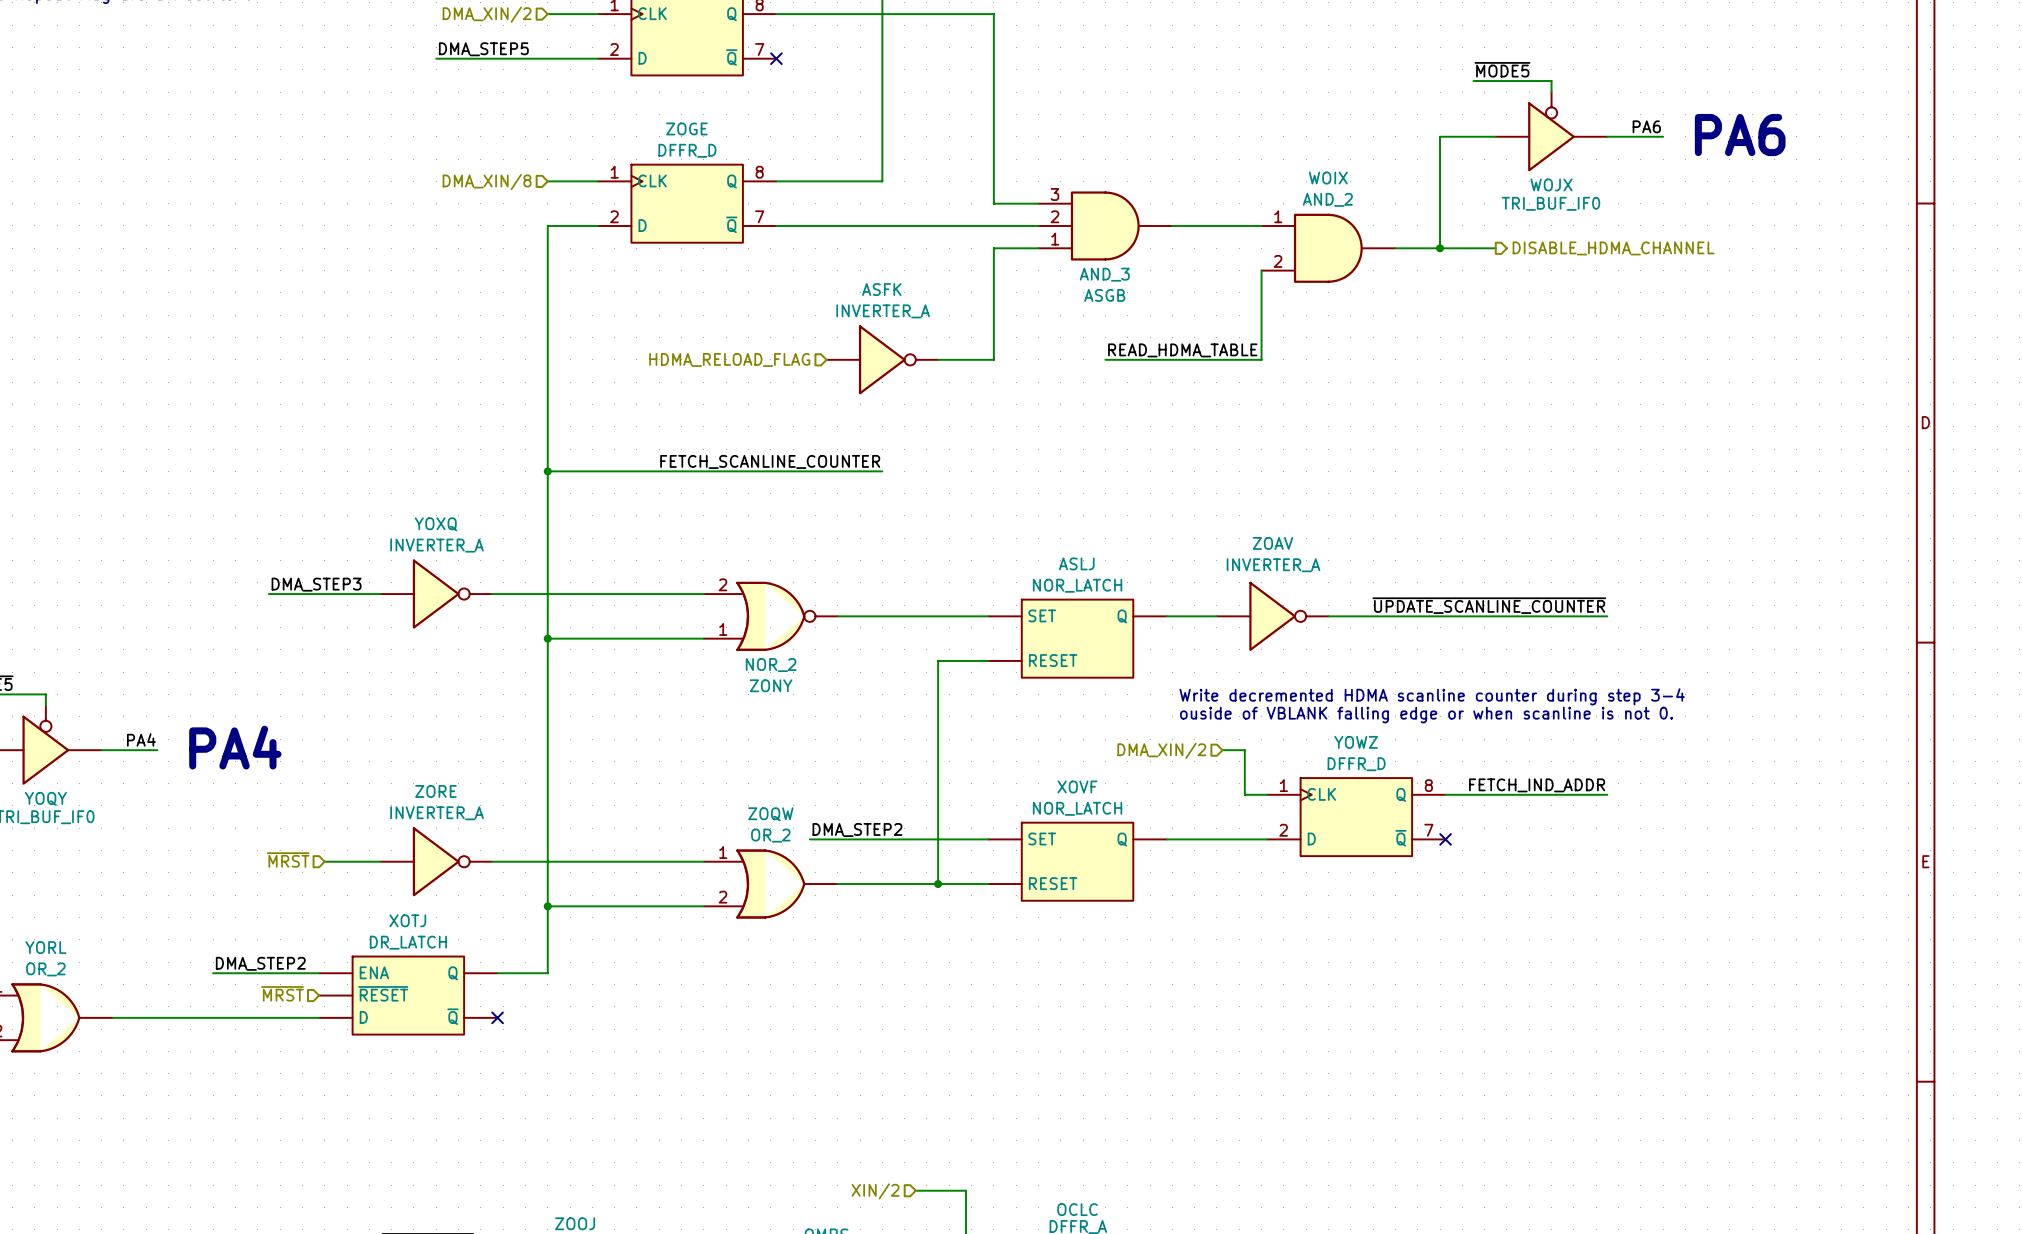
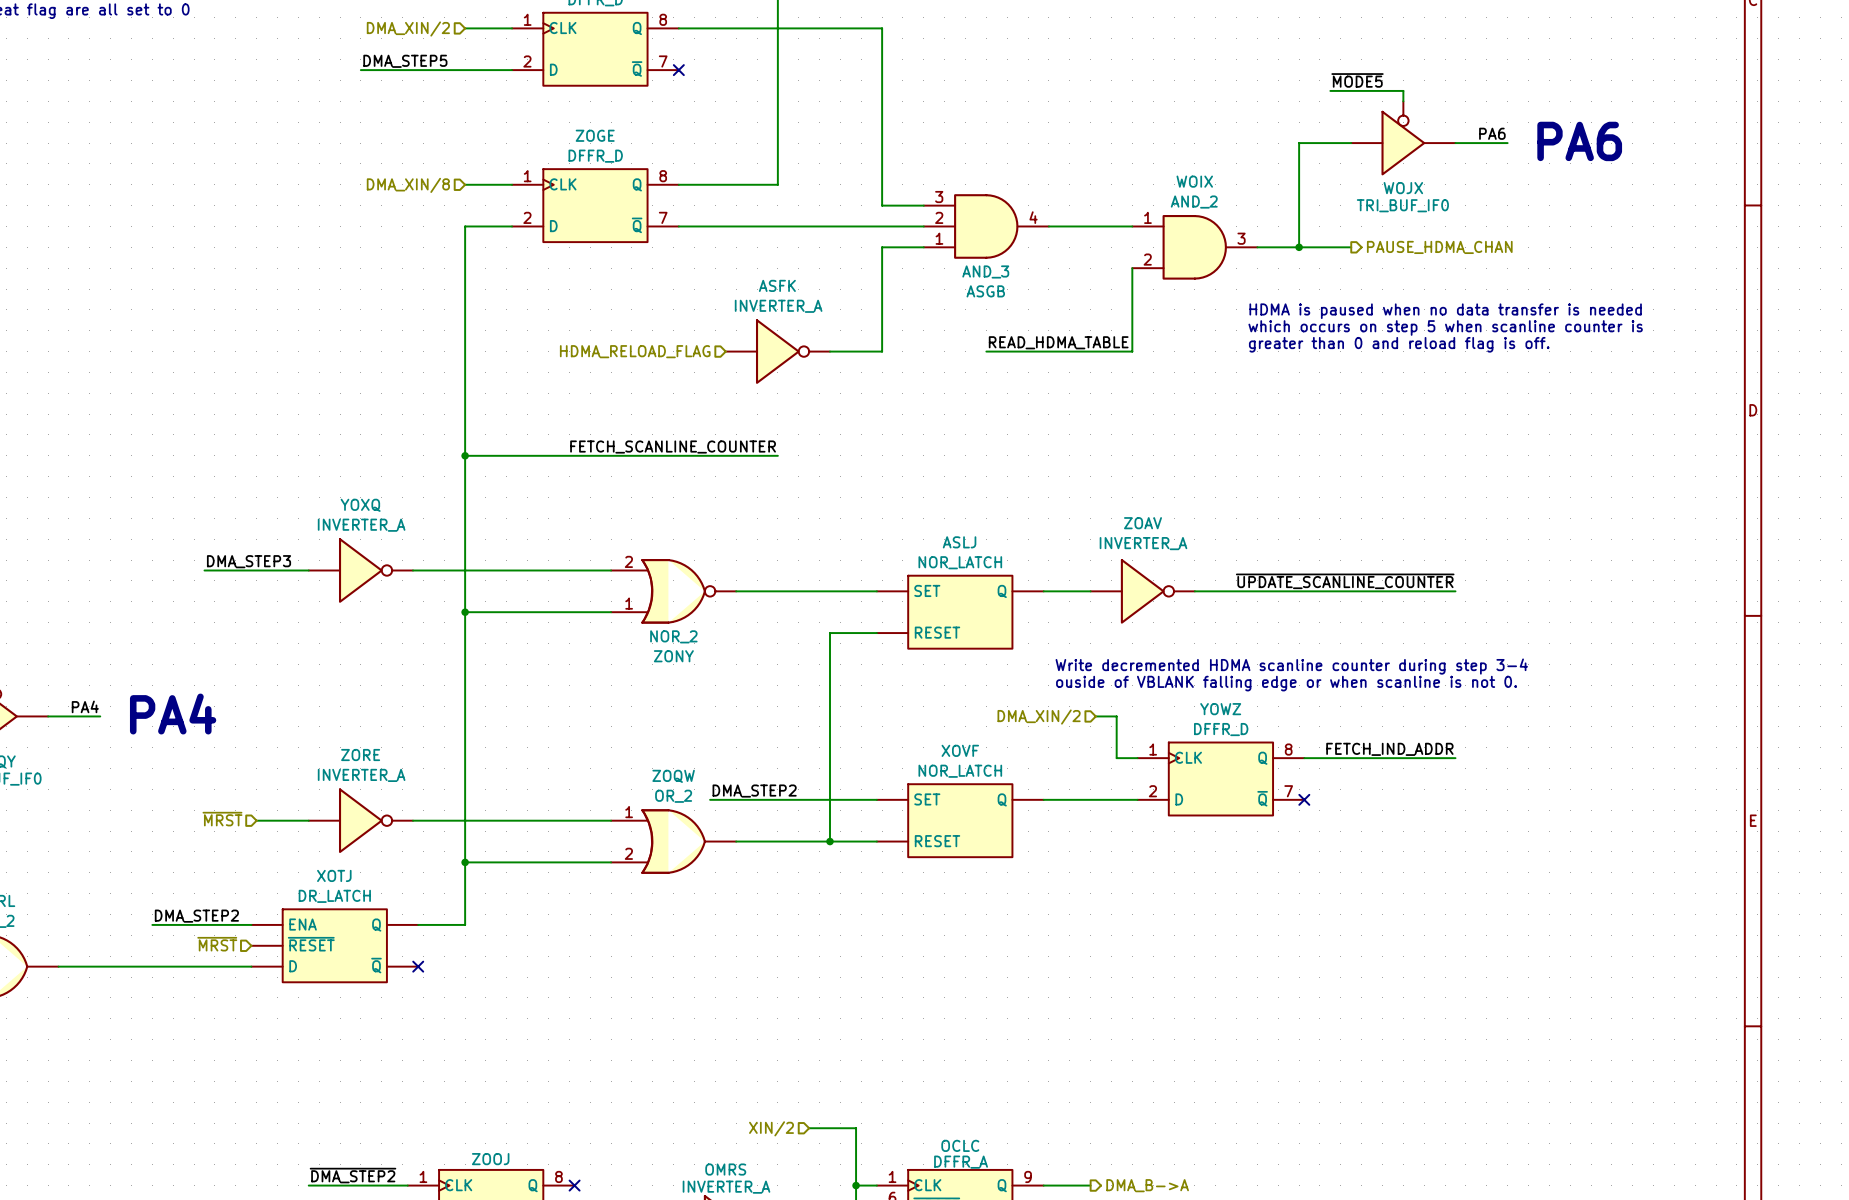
ASGB pin number: none -> 4 (1033, 217)
WOIX pin number: none -> 3 (1241, 238)
hierarchical label: DISABLE_HDMA_CHANNEL (1613, 248) -> PAUSE_HDMA_CHAN (1439, 247)
text: none -> HDMA is paused when no data transfer is needed (1445, 311)
text: none -> which occurs on step 5 when scanline counter is (1445, 327)
text: none -> greater than 0 and reload flag is off. (1399, 344)

